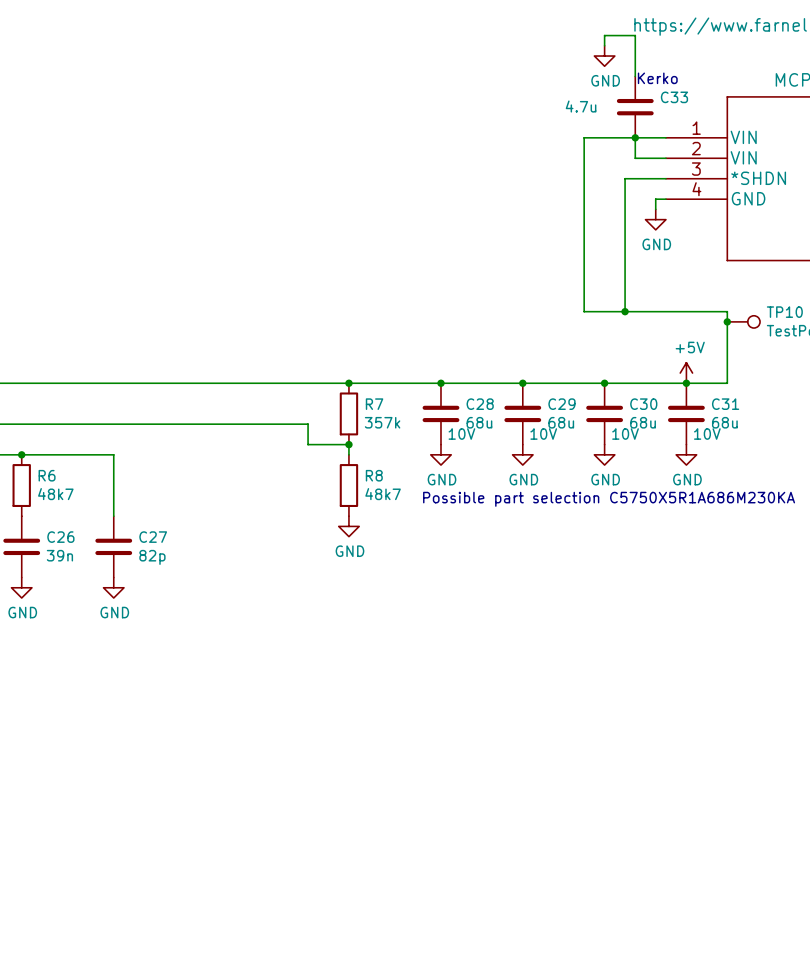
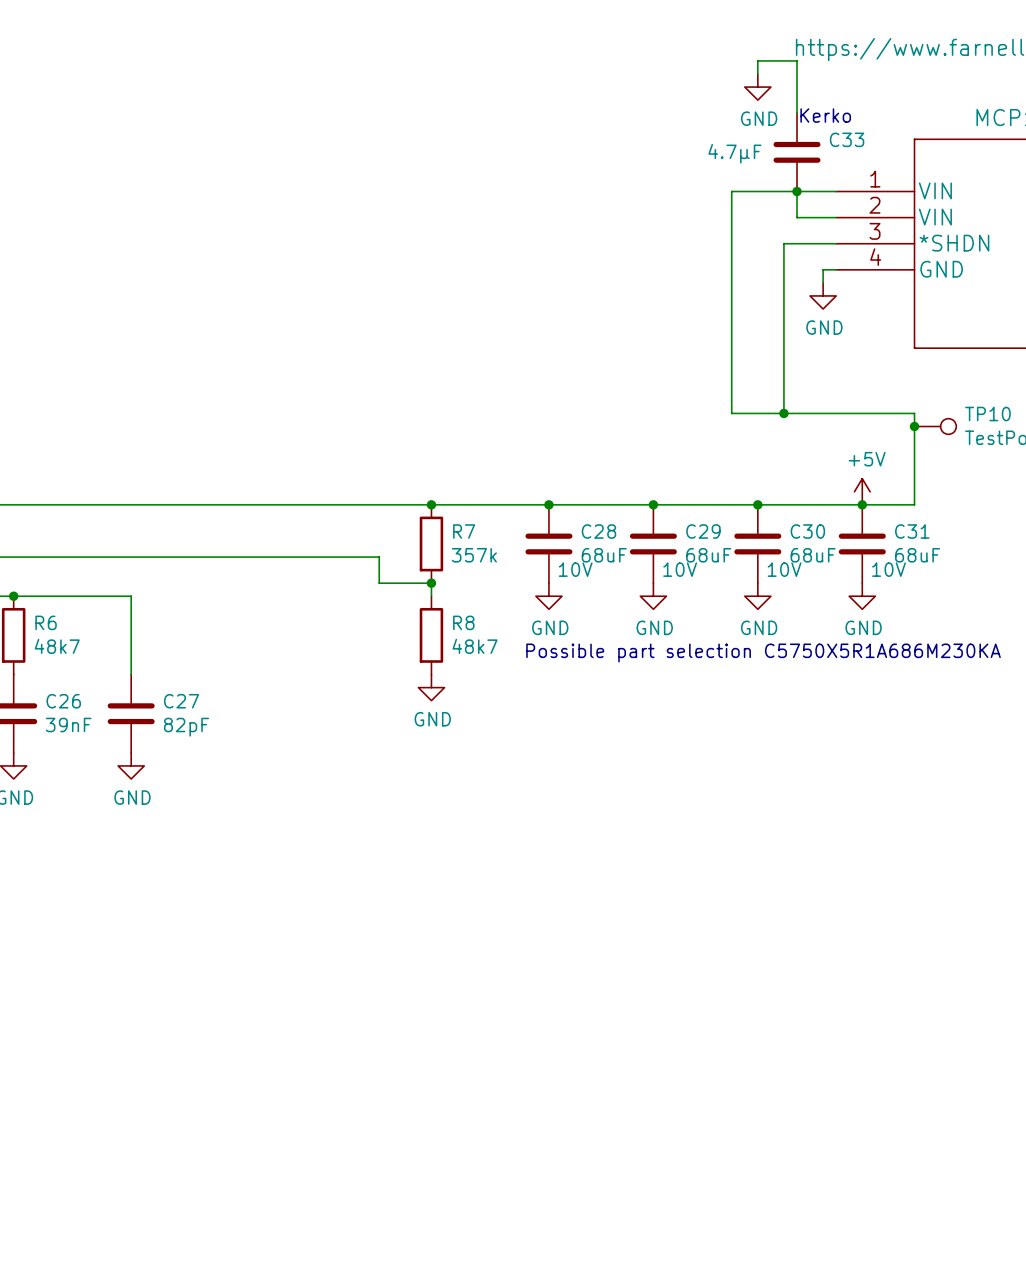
C33 value: 4.7u (581, 106) -> 4.7µF (734, 153)
C28 value: 68u (479, 422) -> 68uF (604, 555)
C29 value: 68u (561, 422) -> 68uF (708, 555)
C30 value: 68u (643, 422) -> 68uF (813, 555)
C31 value: 68u (724, 422) -> 68uF (917, 555)
C26 value: 39n (59, 555) -> 39nF (68, 724)
C27 value: 82p (152, 557) -> 82pF (186, 727)

